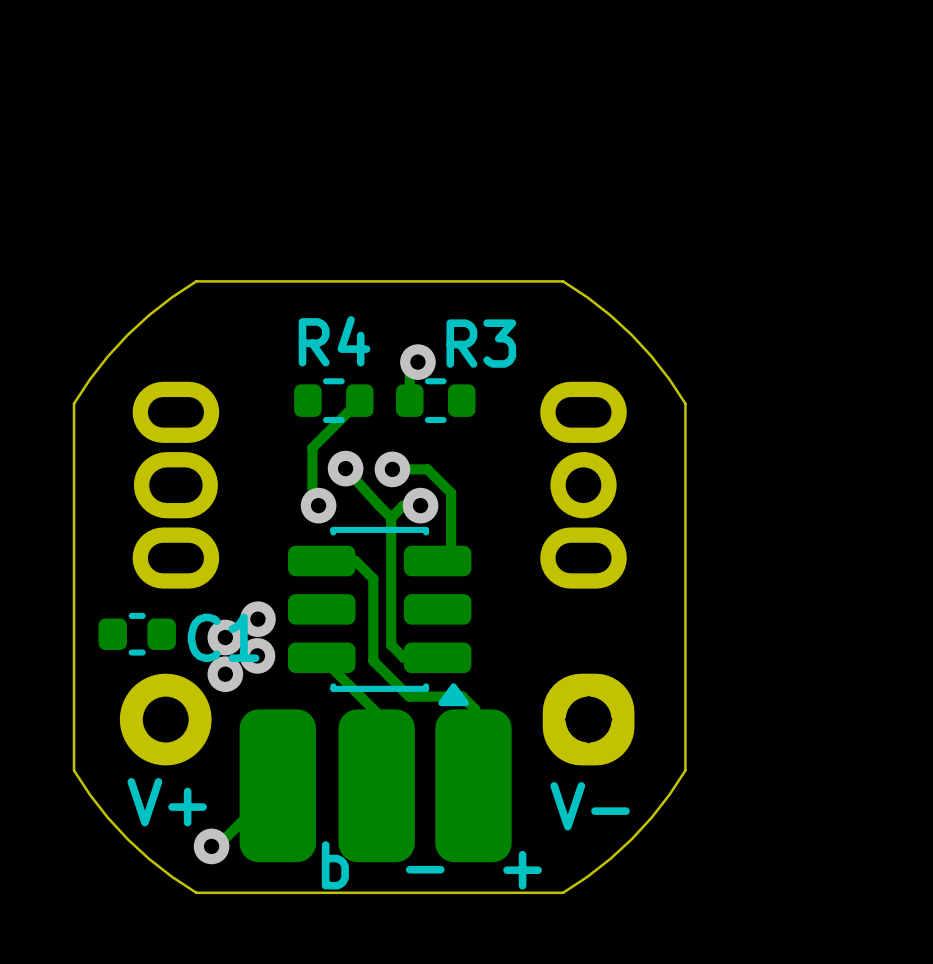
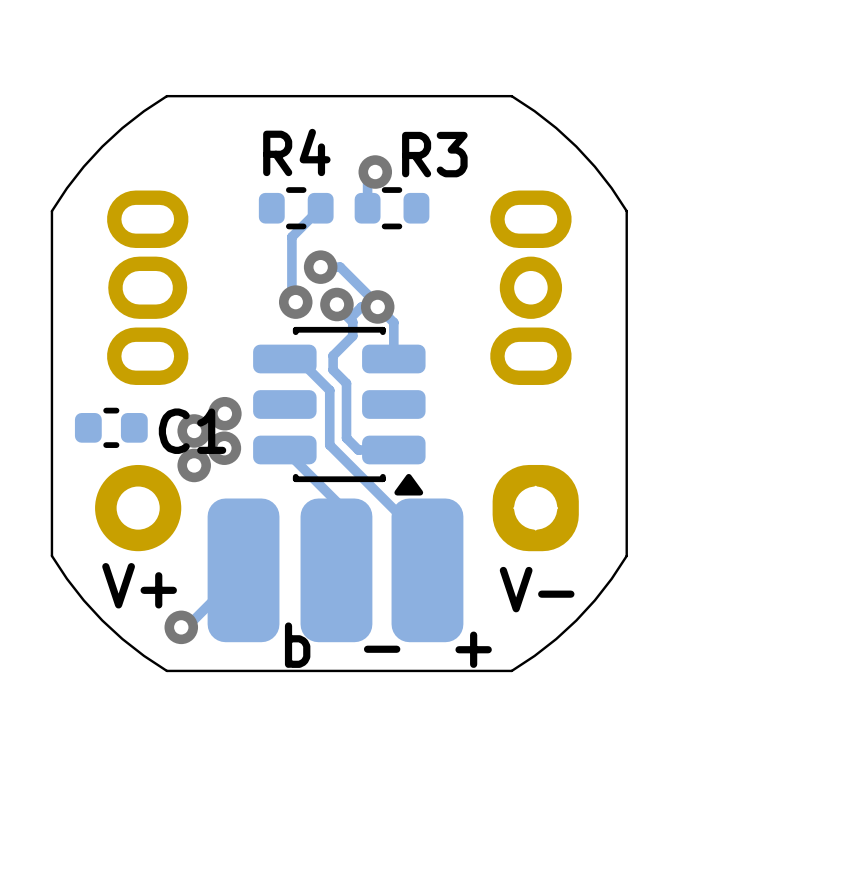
track: (359, 401) (312, 447) (312, 499) (318, 505) -> (320, 208) (291, 236) (291, 298) (295, 302)
track: (345, 468) (391, 517) (391, 645) (403, 657) -> (336, 304) (352, 322) (352, 336) (333, 355) (333, 370) (346, 383) (346, 438) (358, 450) (362, 450)
via position: (345, 468) -> (320, 267)
via position: (392, 469) -> (336, 304)
track: (387, 474) (392, 469) (427, 469) (451, 492) (451, 547) (437, 560) -> (320, 267) (340, 267) (393, 322) (393, 359)
via position: (318, 505) -> (295, 302)
track: (336, 560) (355, 560) (373, 578) (373, 660) (409, 696) (462, 696) (475, 709) (475, 785) -> (298, 359) (329, 390) (329, 445) (426, 541) (426, 570)

